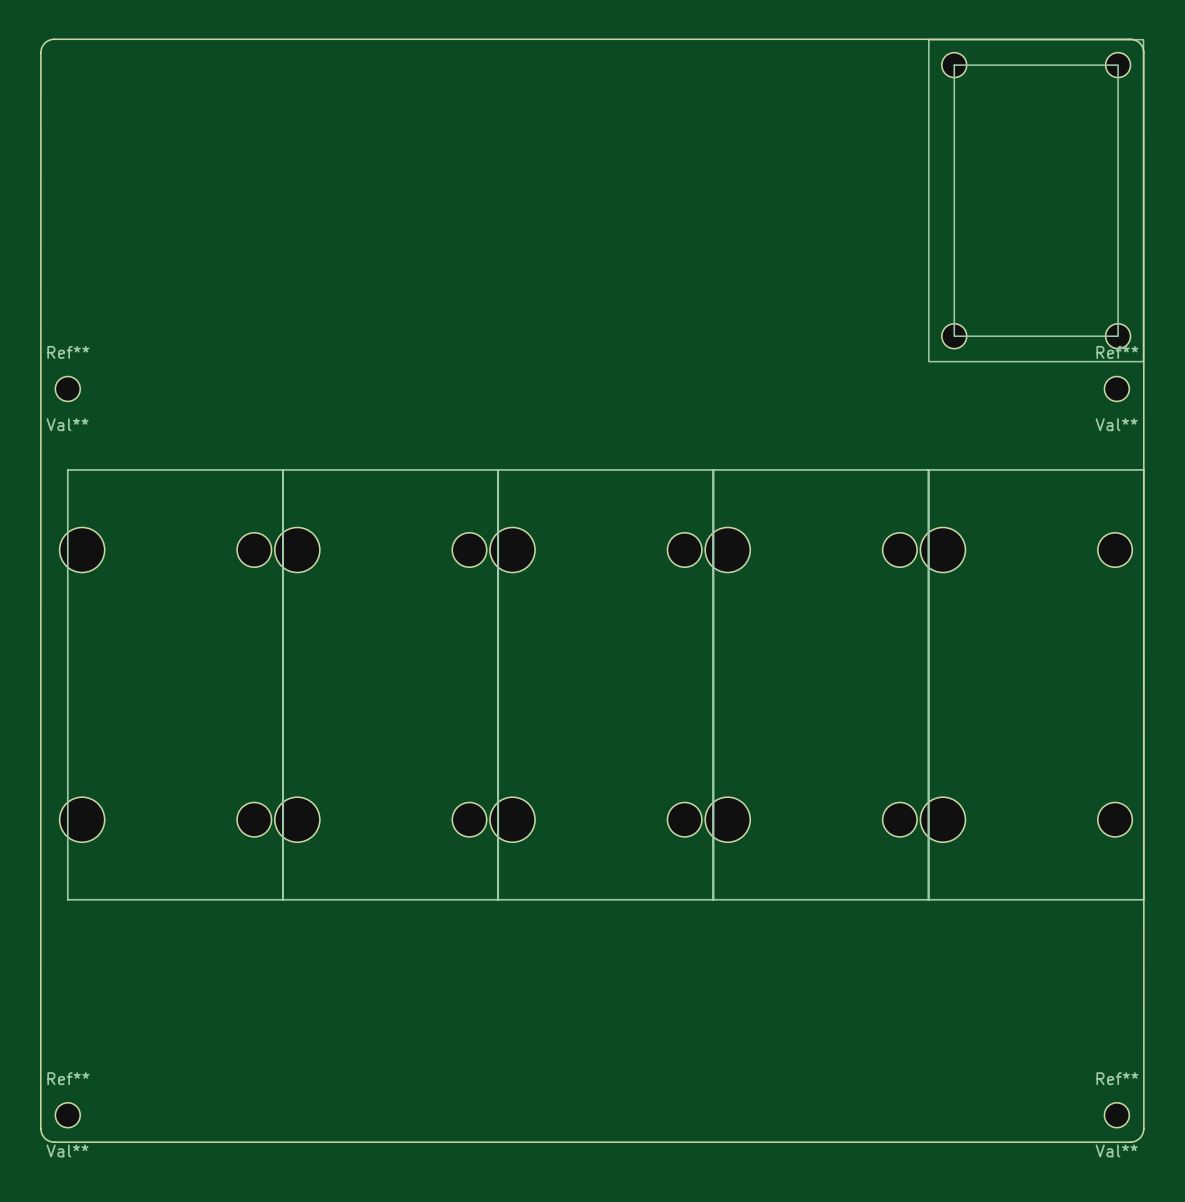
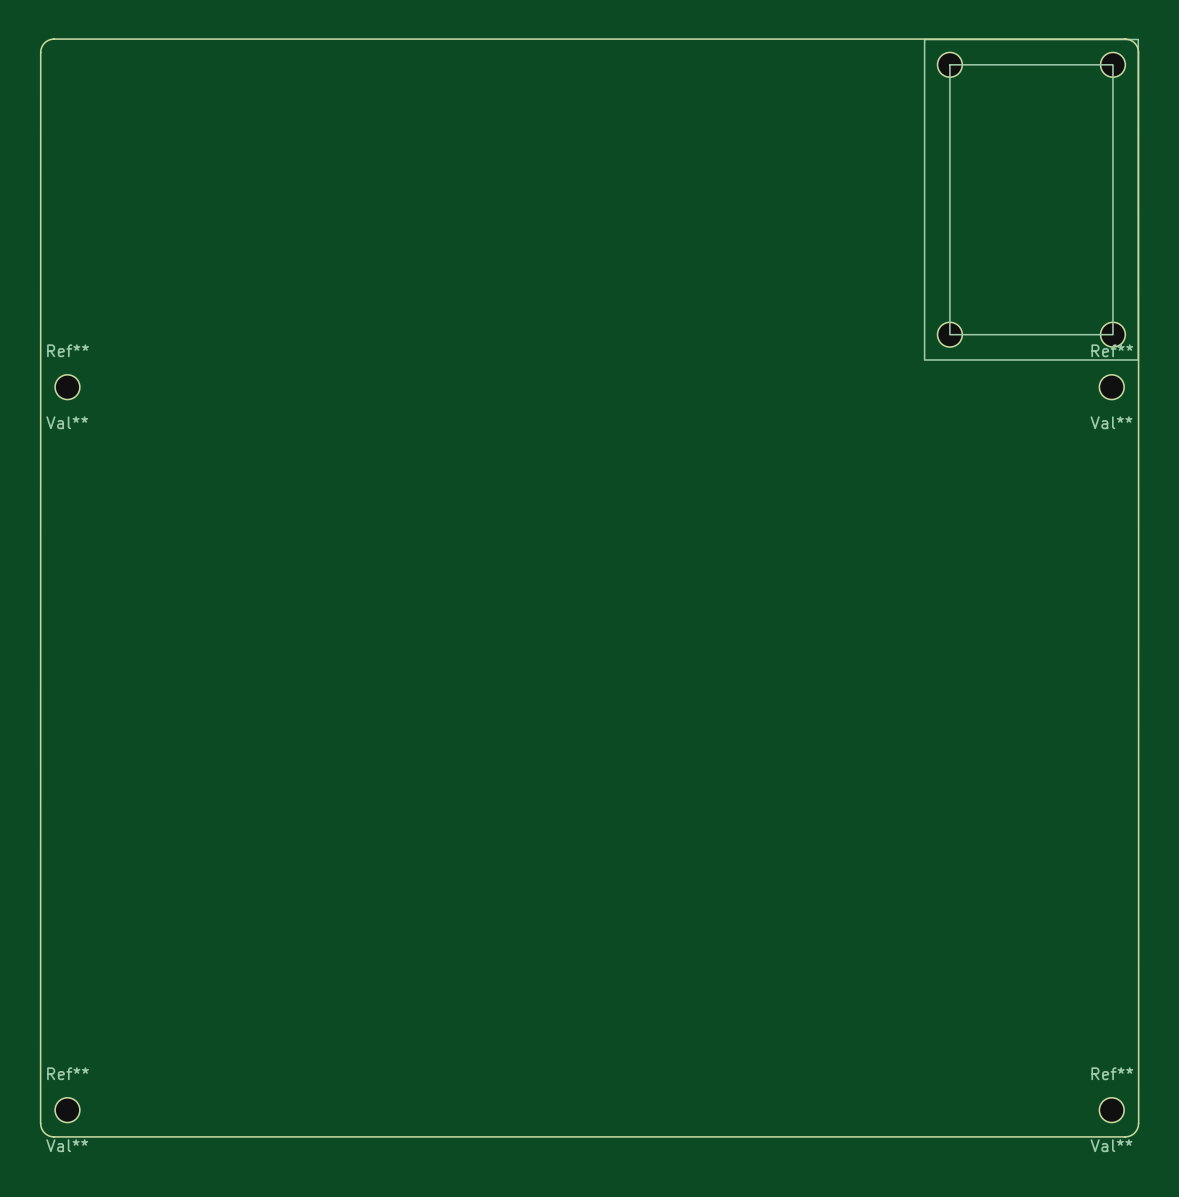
part: (171, 684) -> none
part: (386, 684) -> none
part: (602, 684) -> none
part: (817, 684) -> none
part: (1032, 684) -> none

